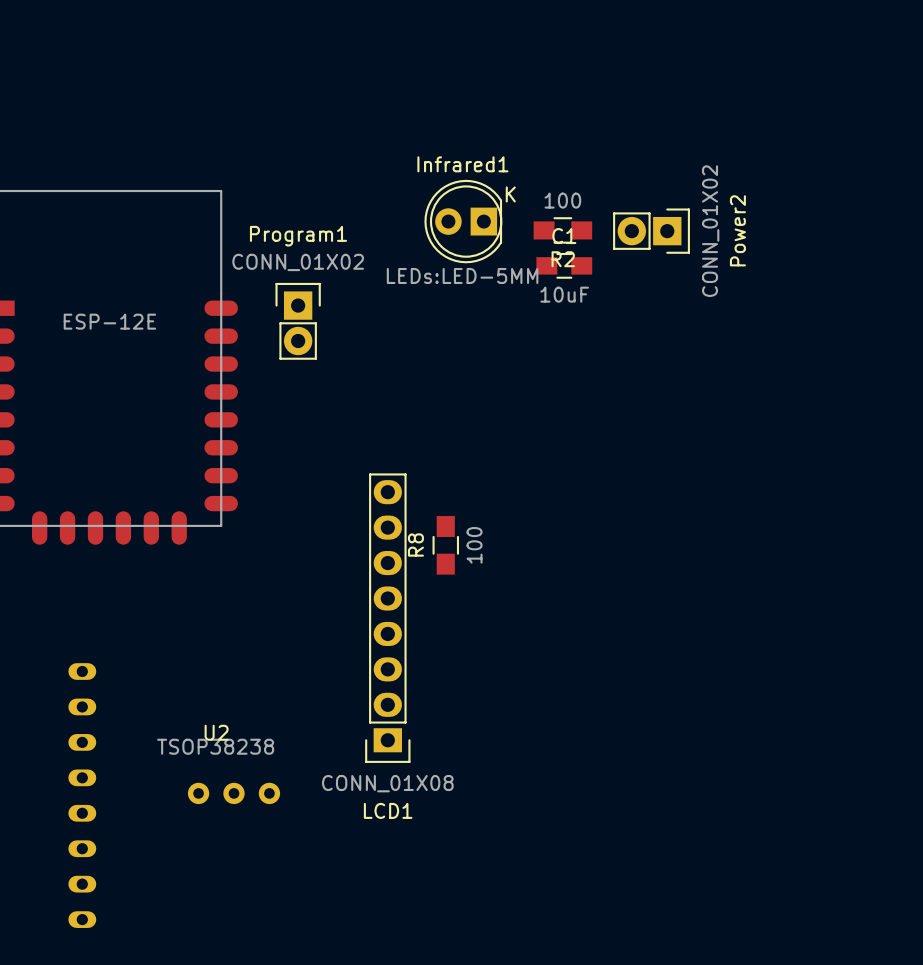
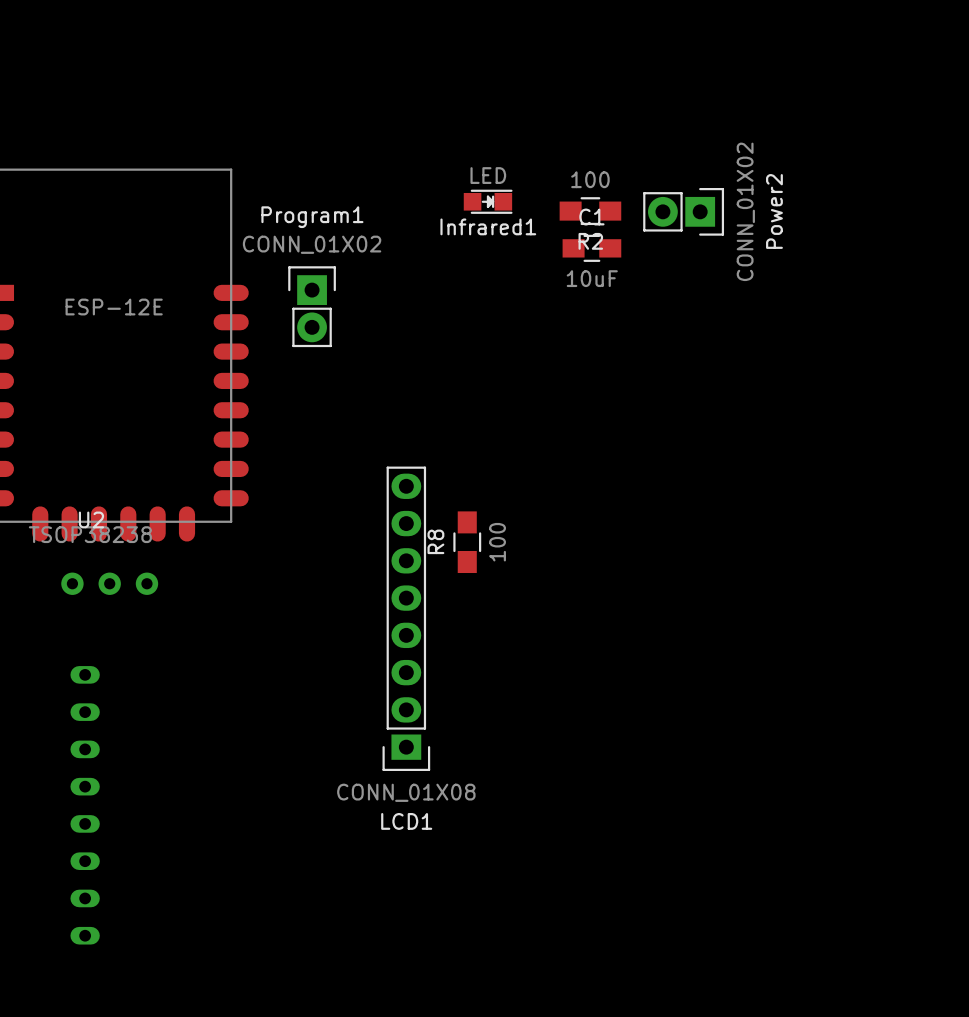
Infrared1 name position: Infrared1 (462, 164) -> Infrared1 (488, 226)
Infrared1 footprint: [424, 179, 503, 264] -> [463, 189, 513, 214]
Infrared1 value: LEDs:LED-5MM (462, 275) -> LED (488, 175)
U2 position: (233, 793) -> (109, 583)

